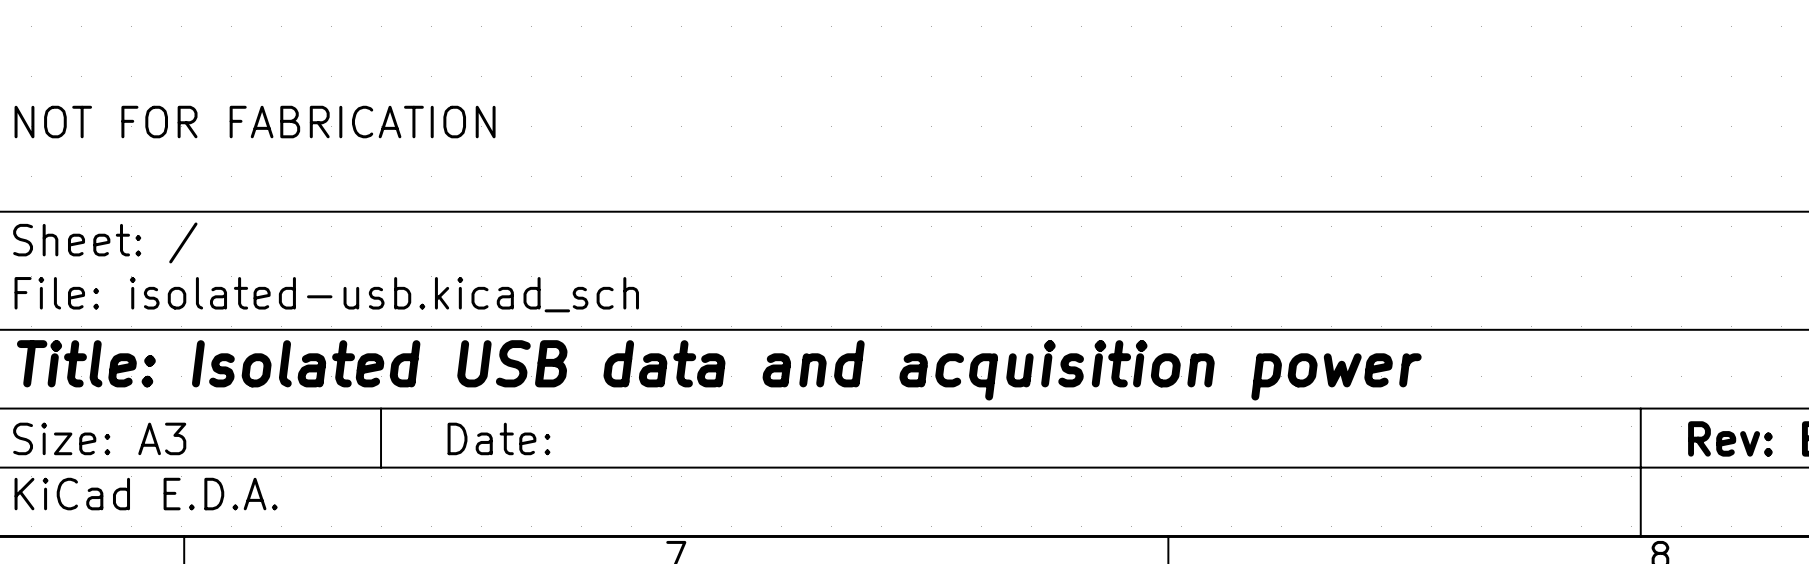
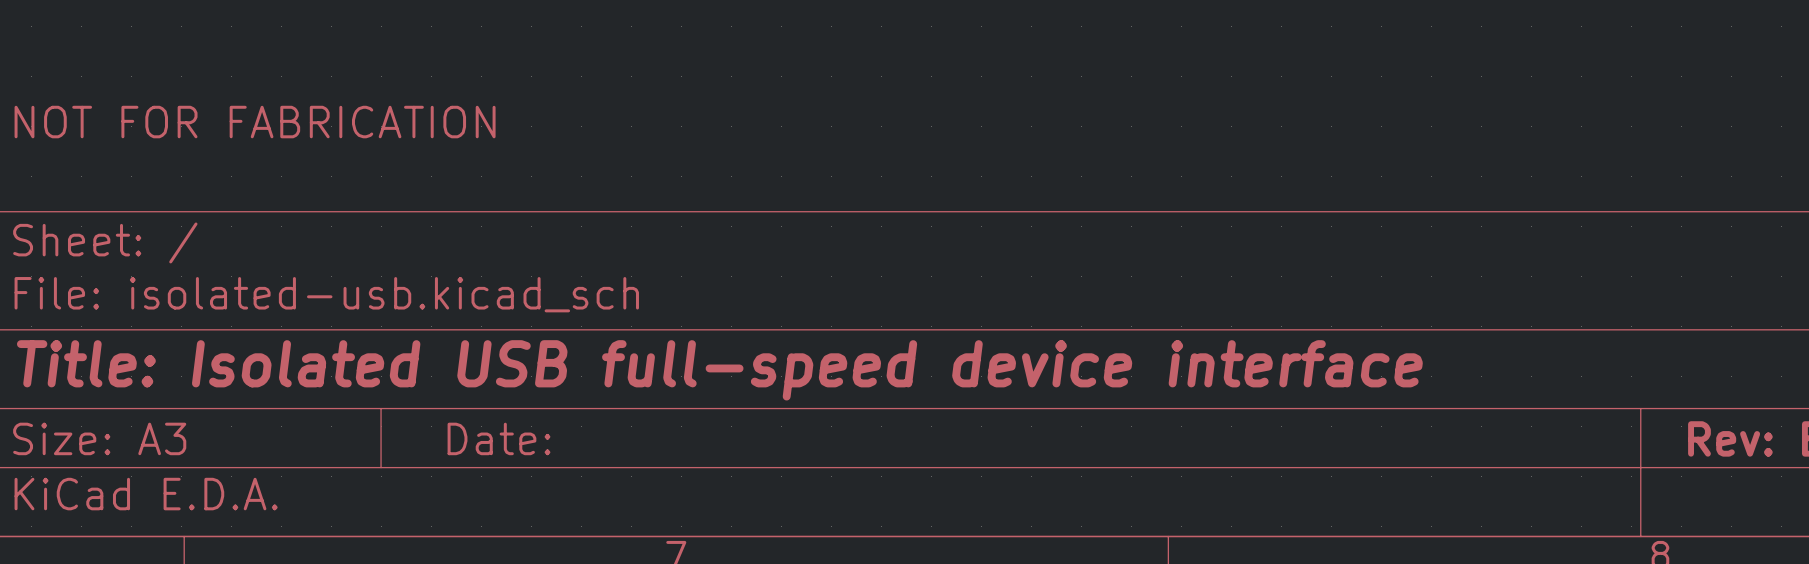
title block: Title: Isolated USB data and acquisition power (719, 370) -> Title: Isolated USB full-speed device interface (719, 370)

